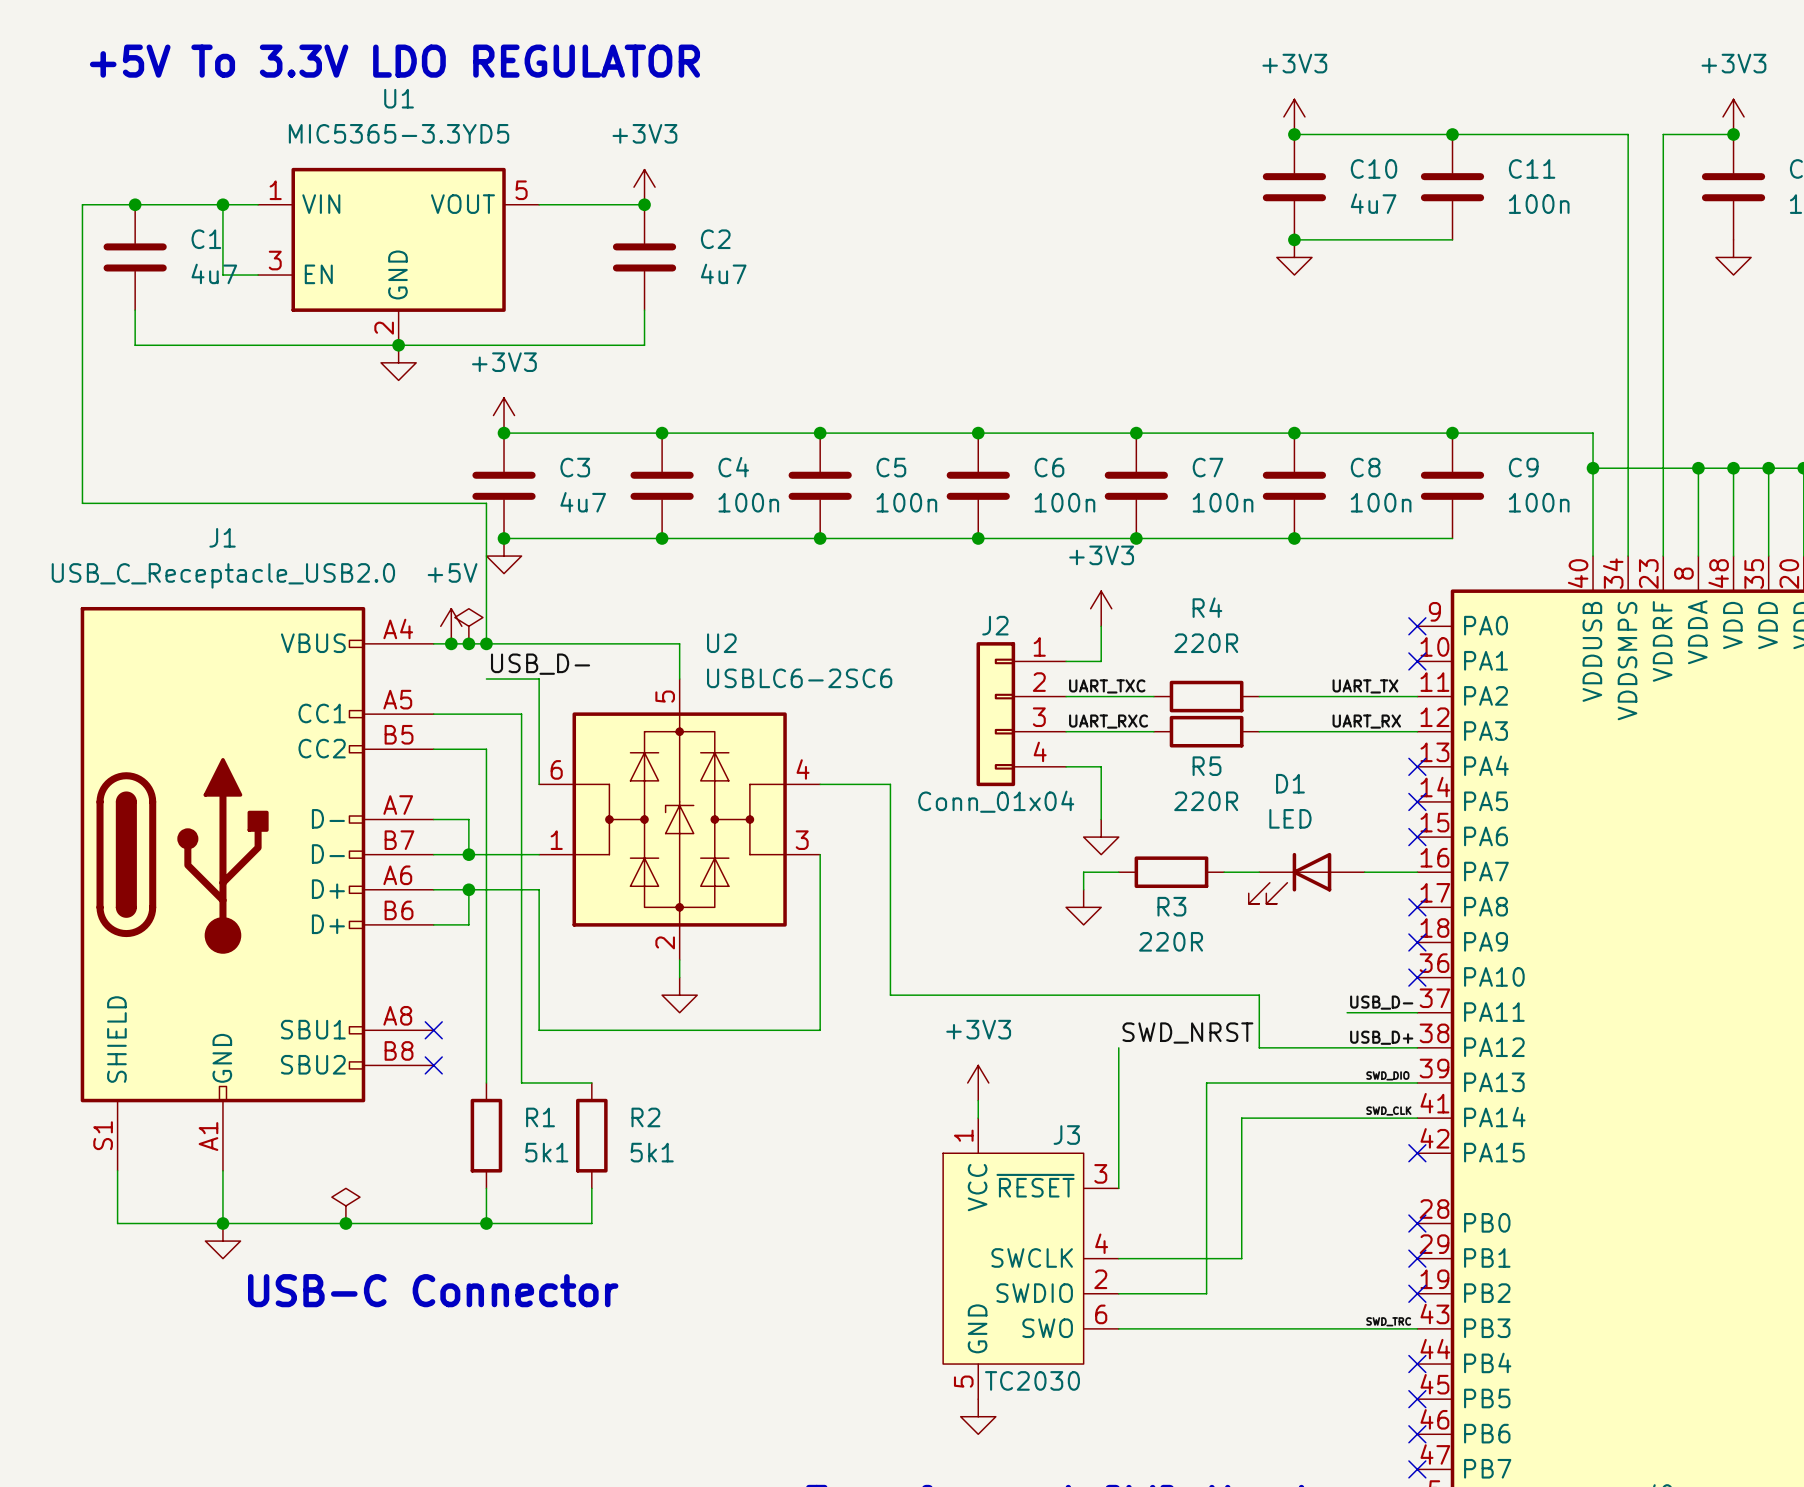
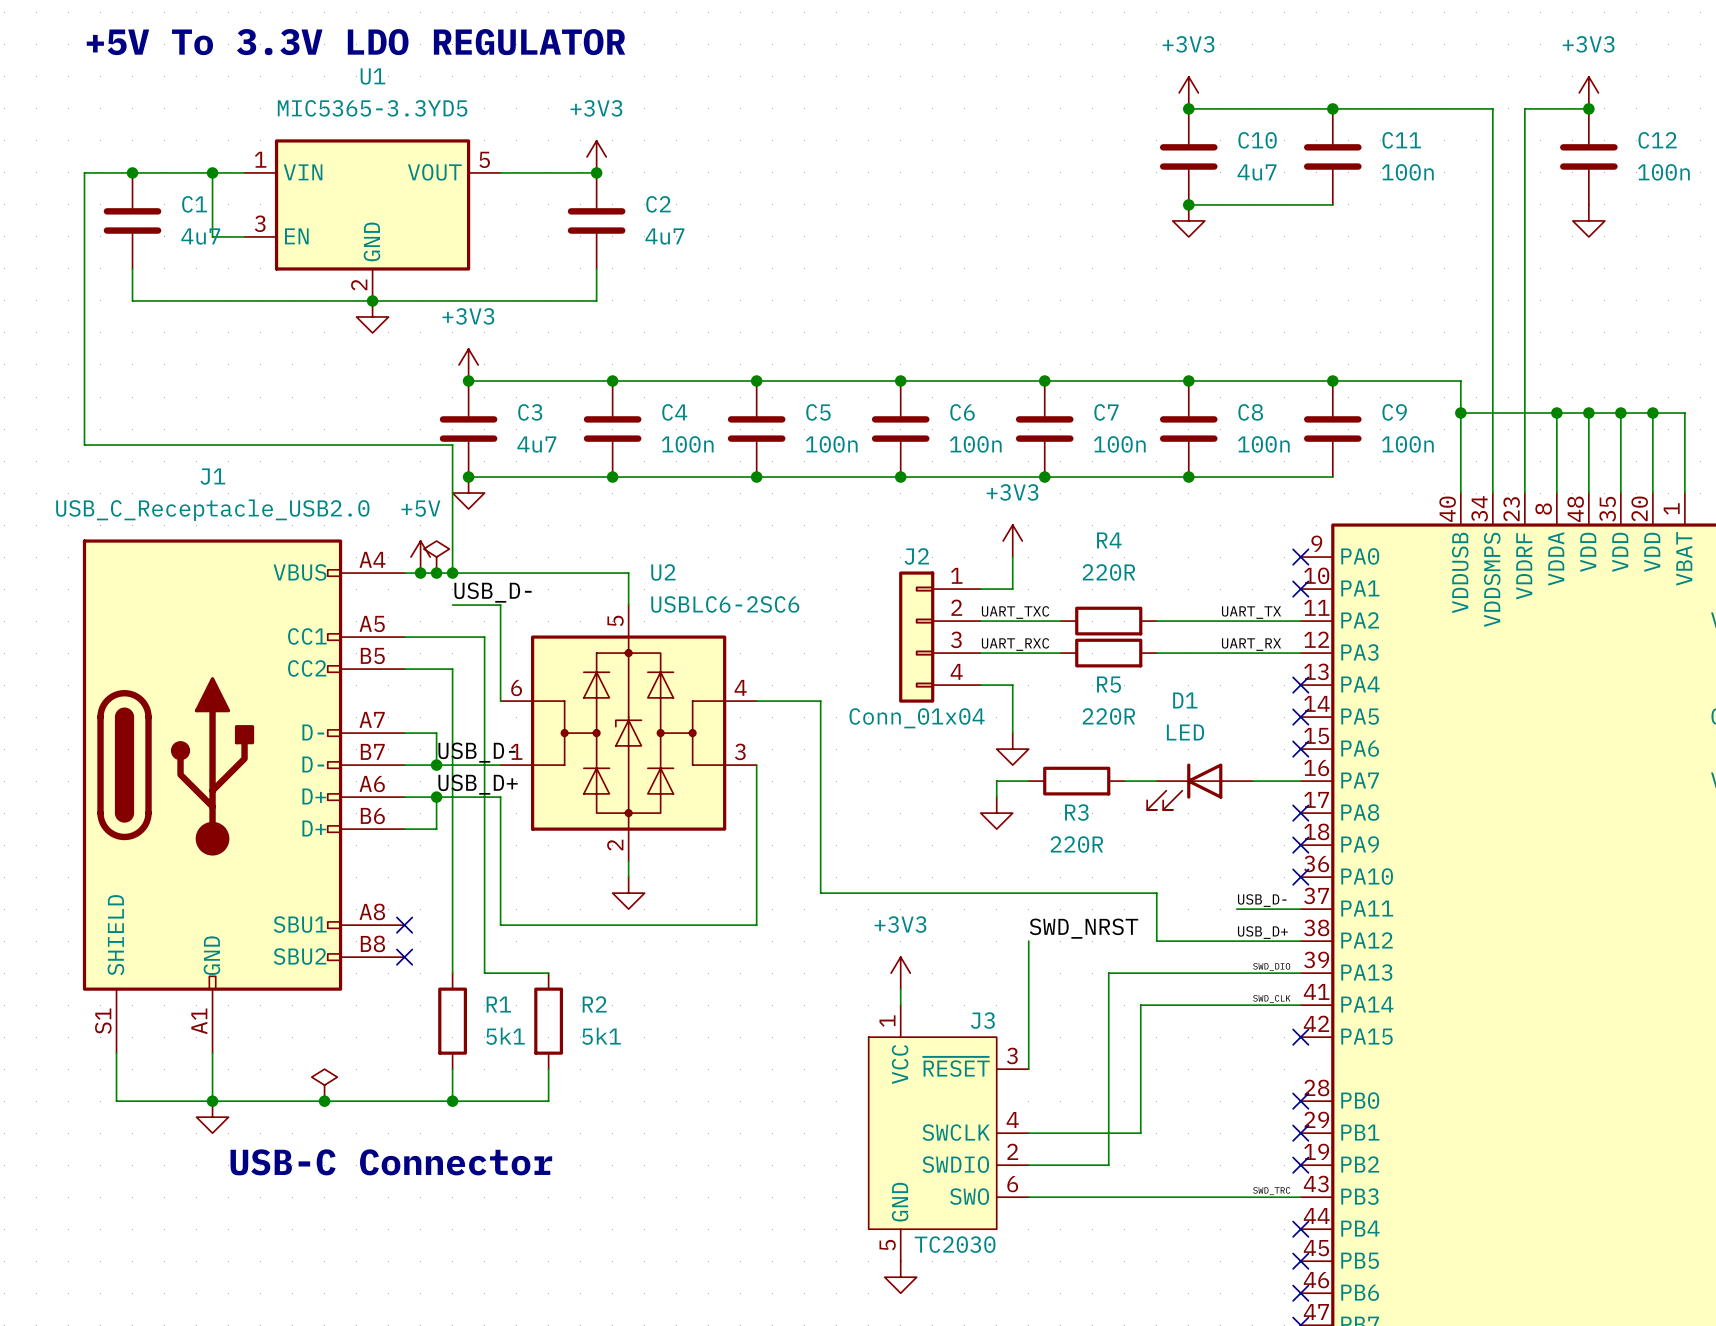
label: none -> USB_D- (477, 752)
label: none -> USB_D+ (478, 784)

